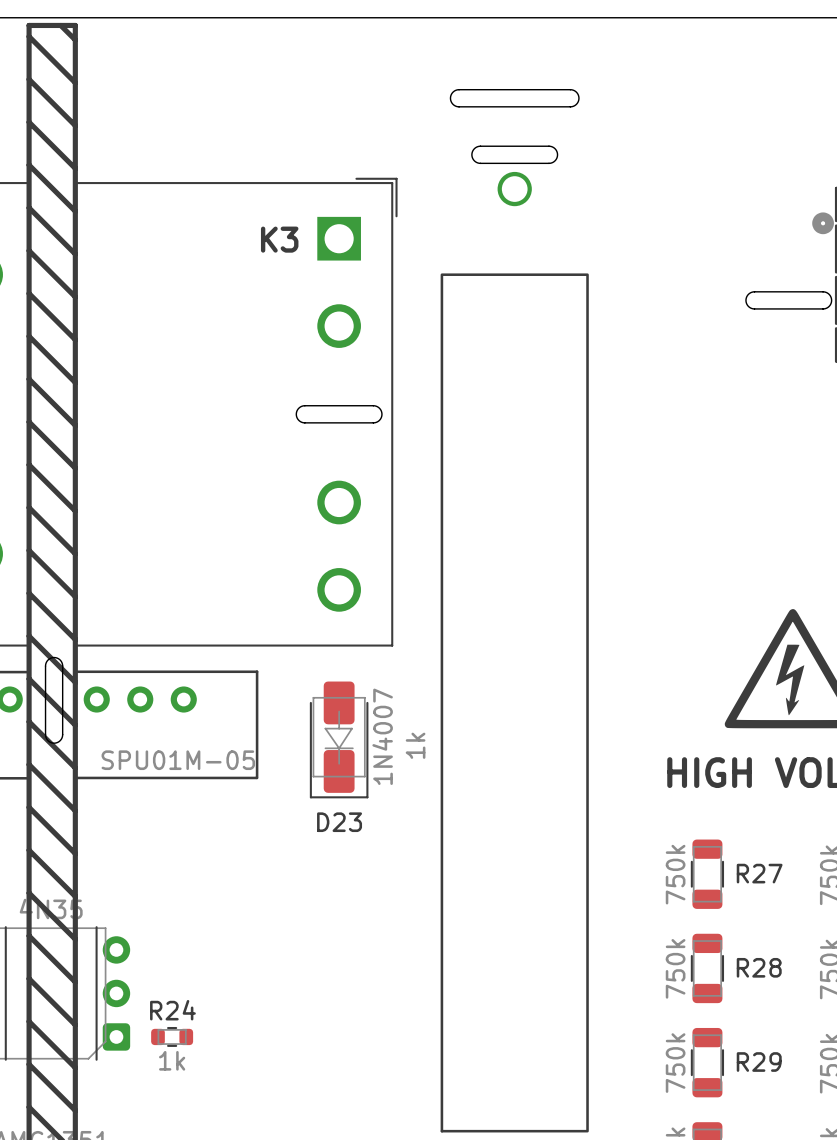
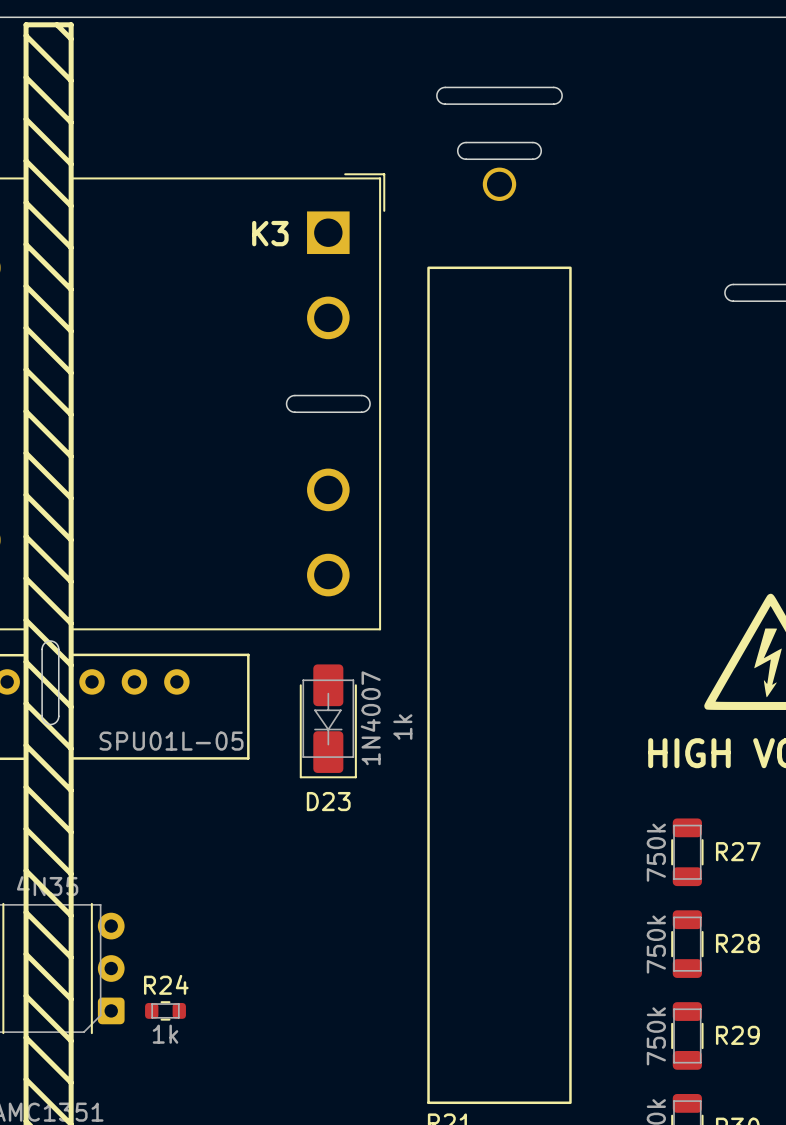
part value: SPU01M-05 (178, 760) -> SPU01L-05 (171, 741)

